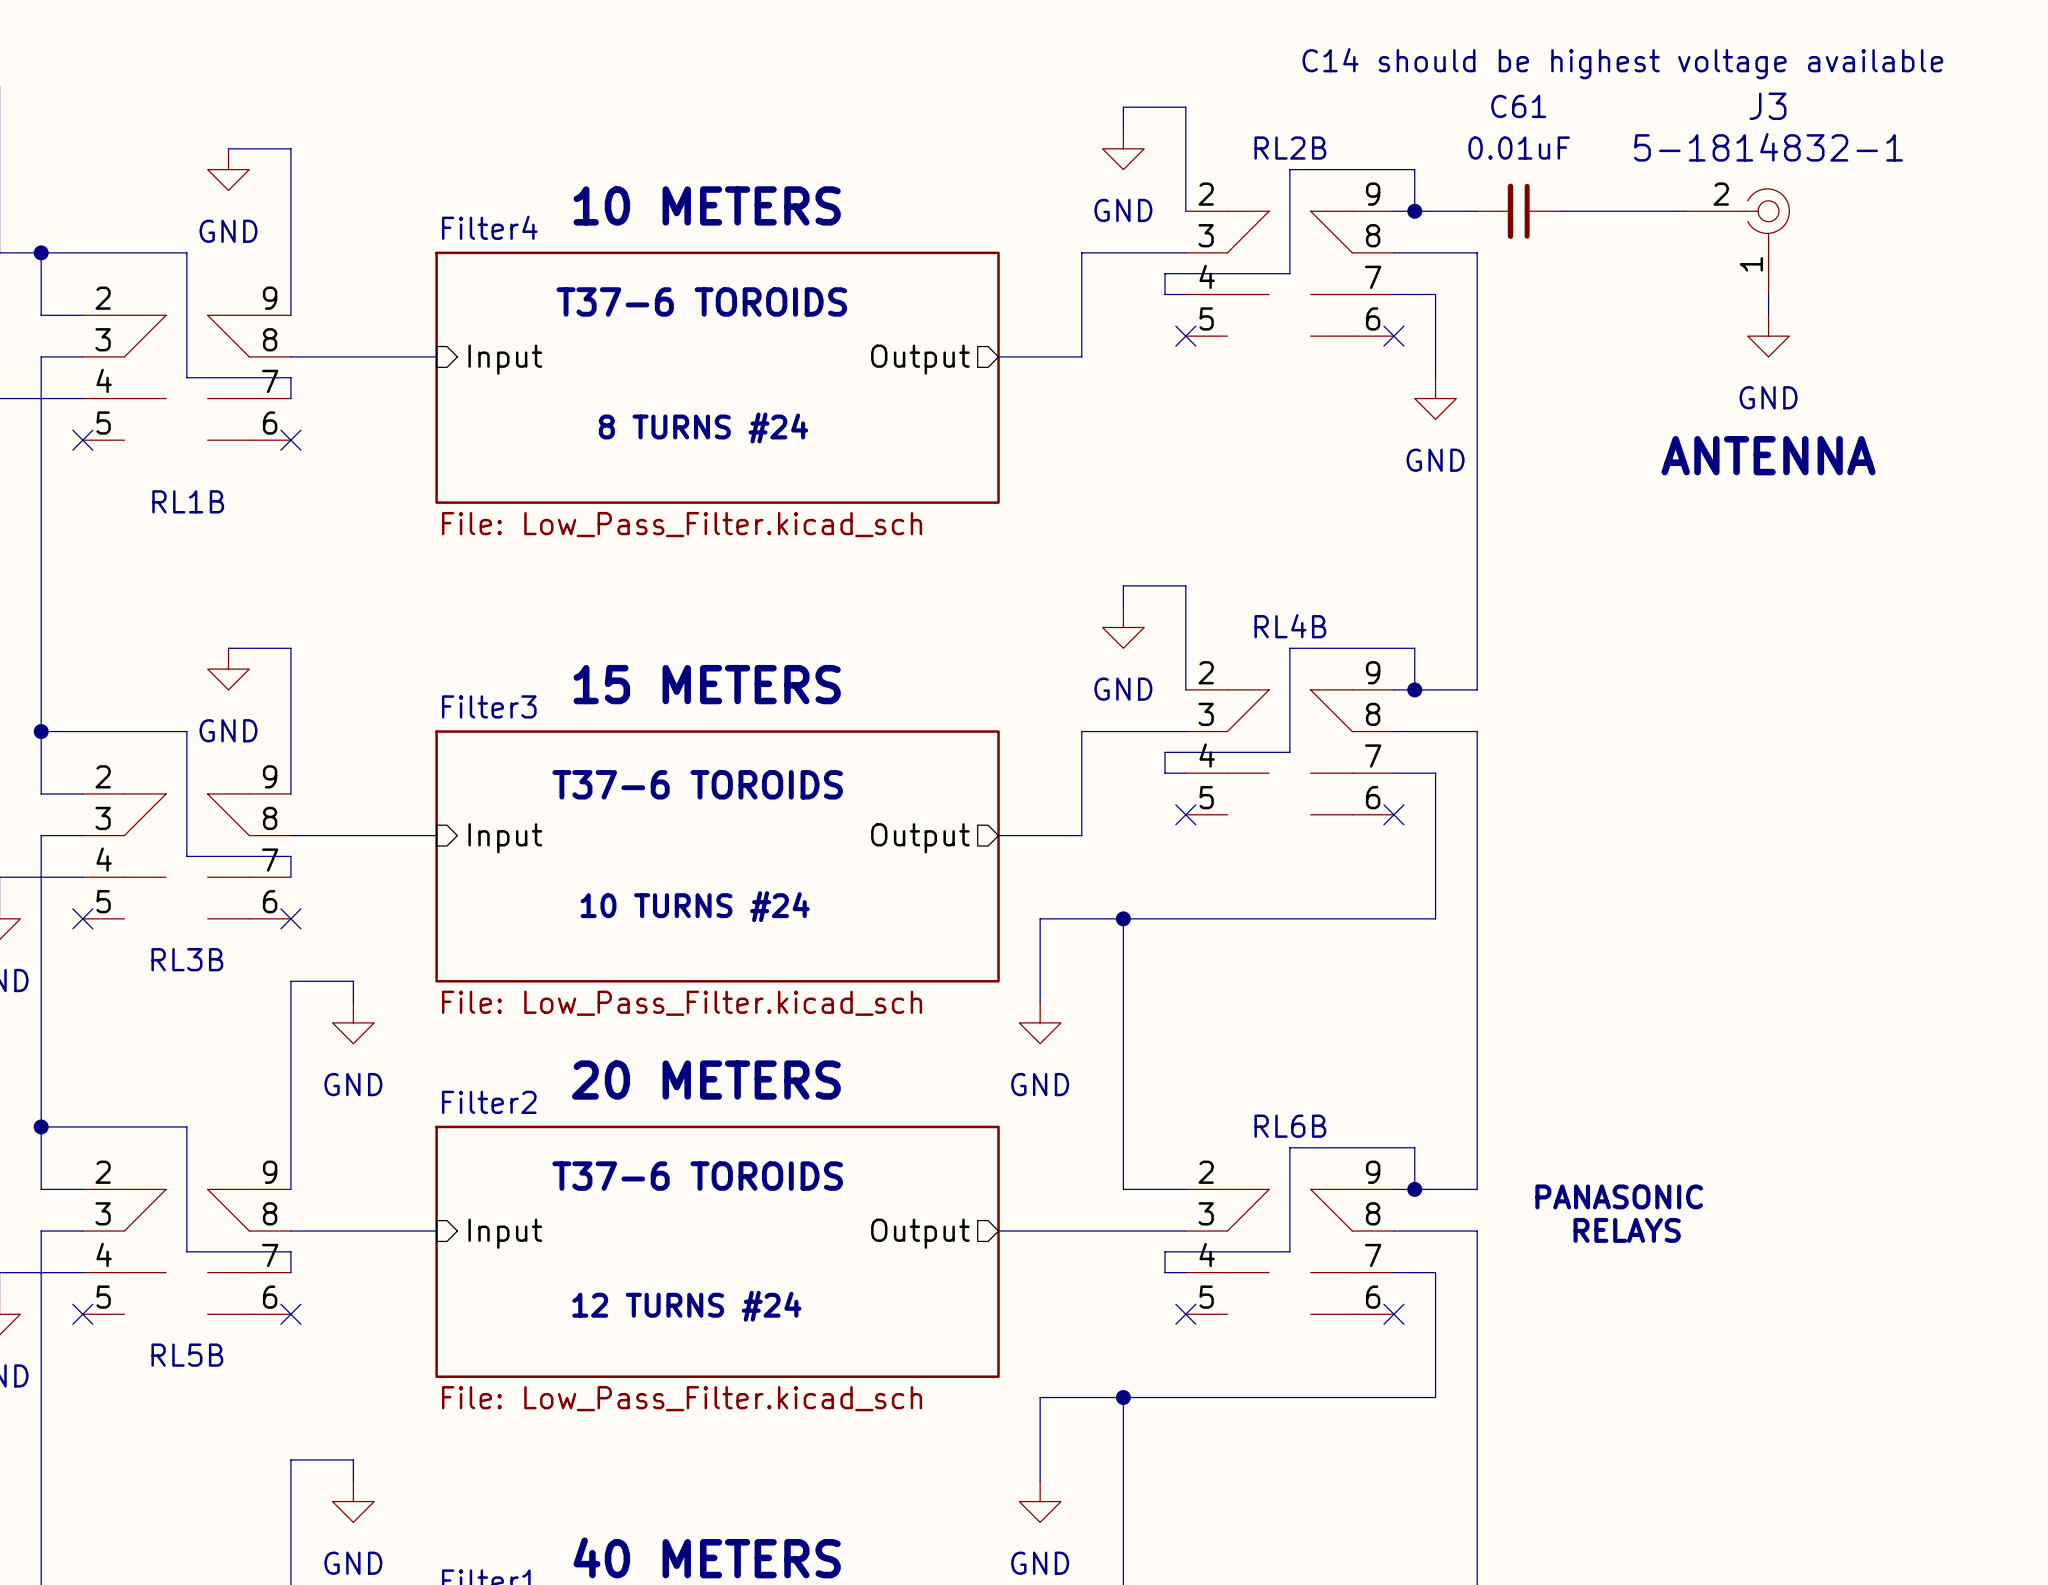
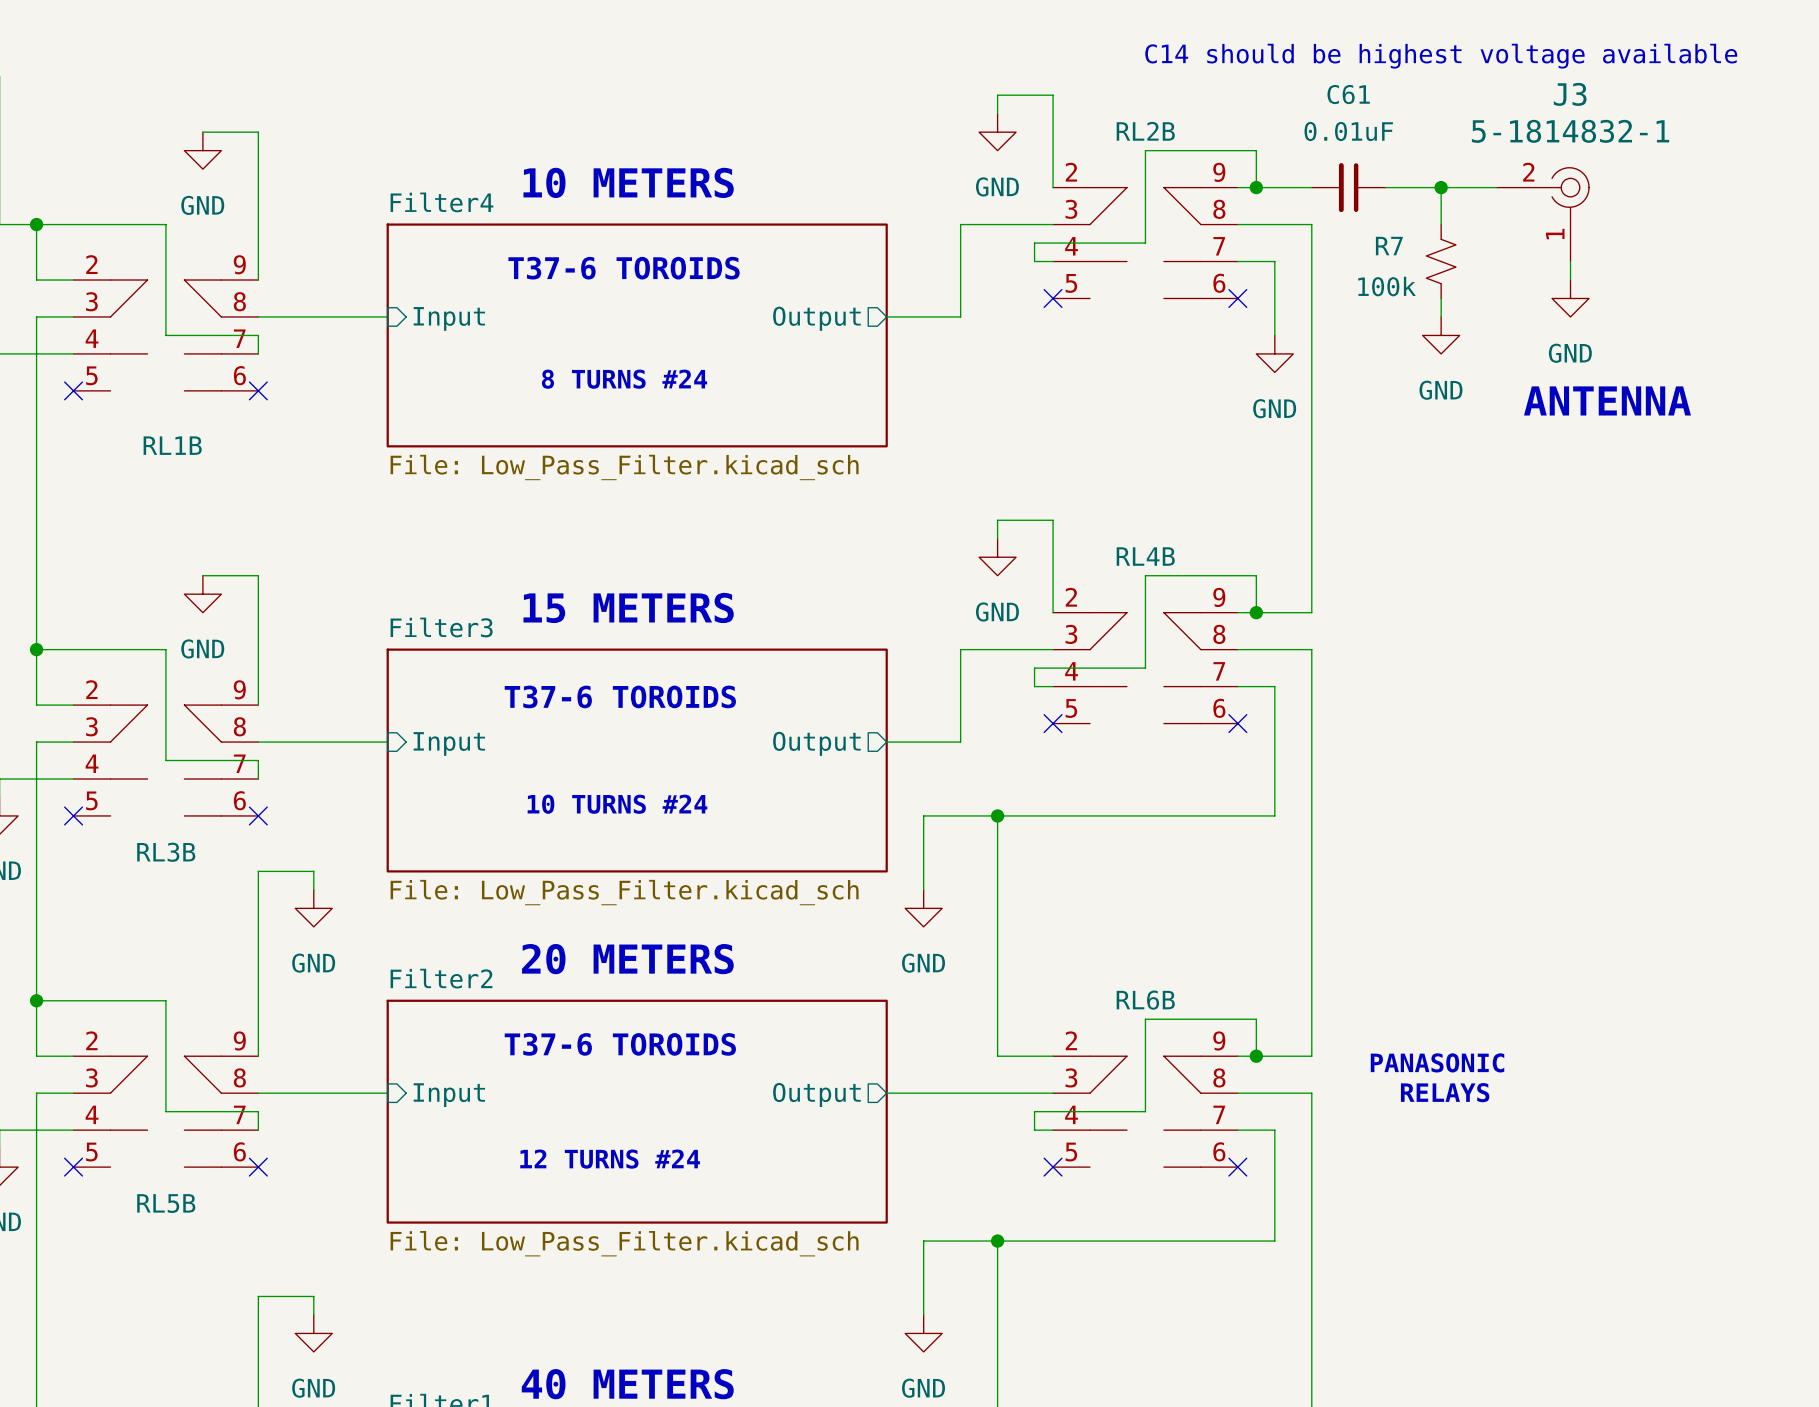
wire: none -> (1441, 187) (1441, 224)
junction: none -> (1441, 187)
R7: none -> 100k (1441, 261)
wire: none -> (1441, 298) (1441, 316)
power symbol: none -> GND (1441, 335)
text position: ANTENNA (1768, 455) -> ANTENNA (1607, 400)

